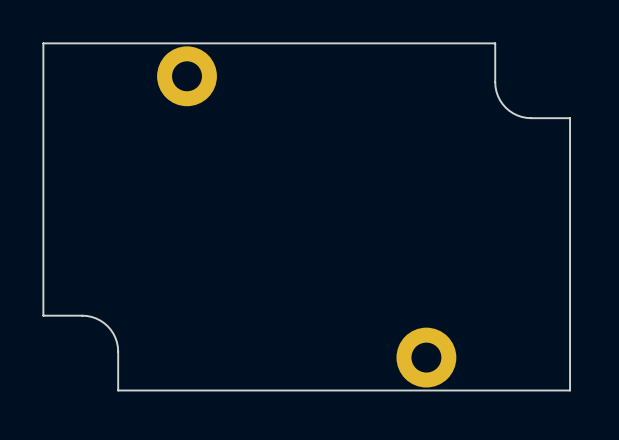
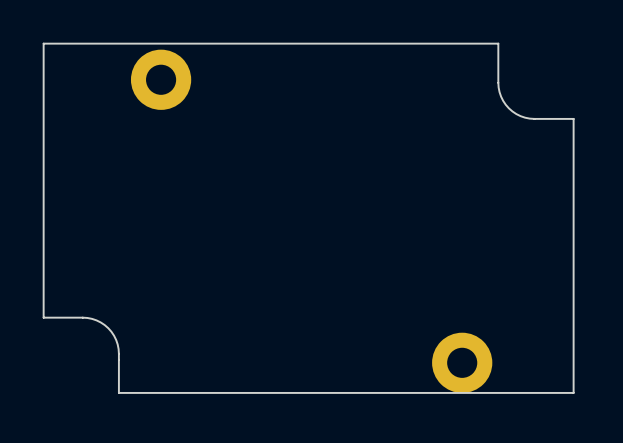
part position: (187, 76) -> (161, 79)
part position: (426, 357) -> (462, 362)

